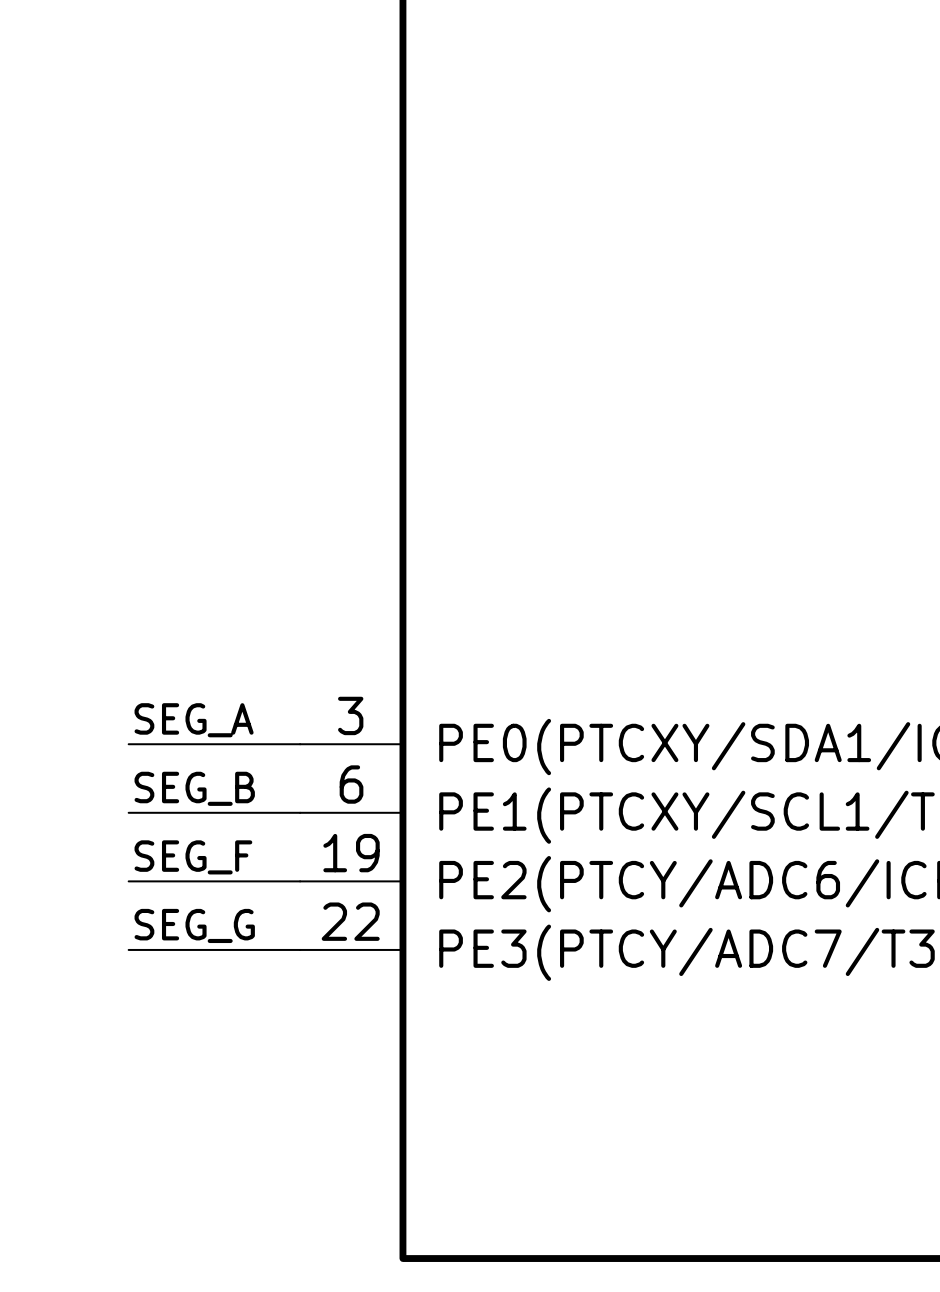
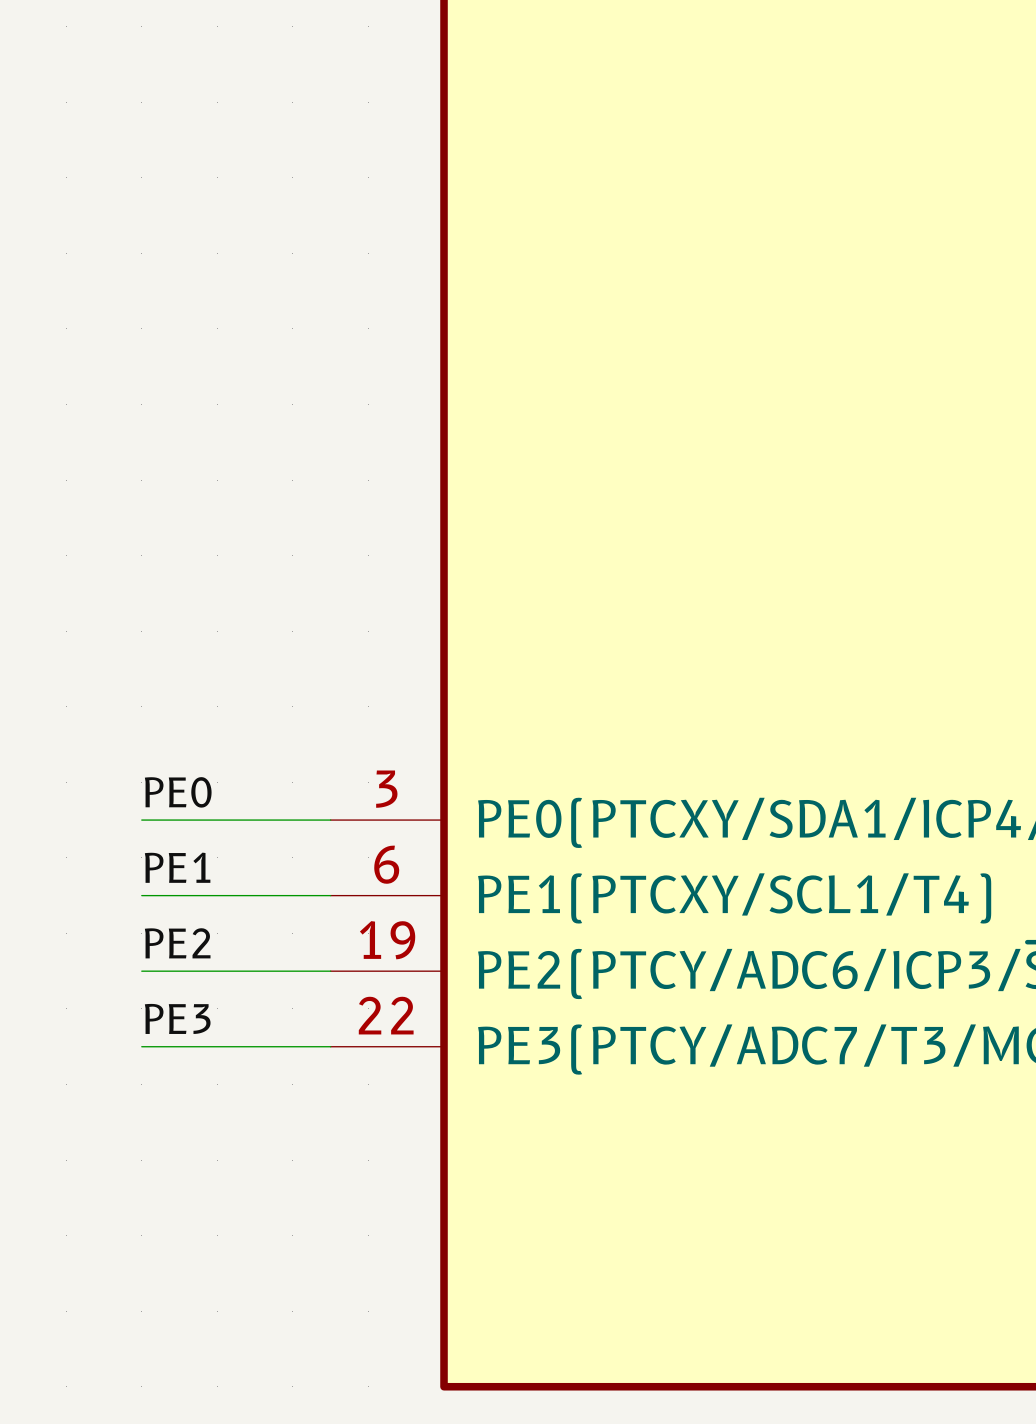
label: SEG_A (194, 720) -> PE0 (178, 792)
label: SEG_B (194, 788) -> PE1 (177, 867)
label: SEG_F (193, 857) -> PE2 (177, 943)
label: SEG_G (194, 925) -> PE3 (177, 1018)

